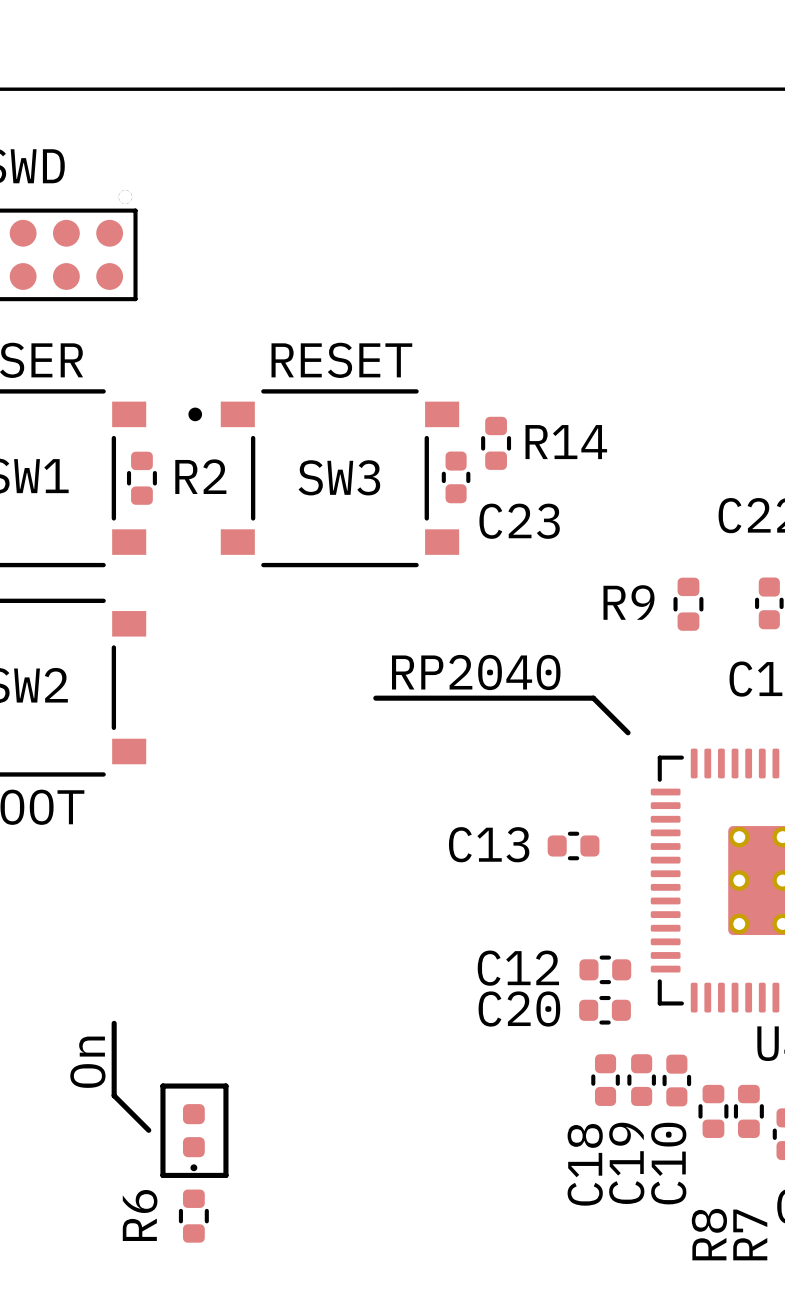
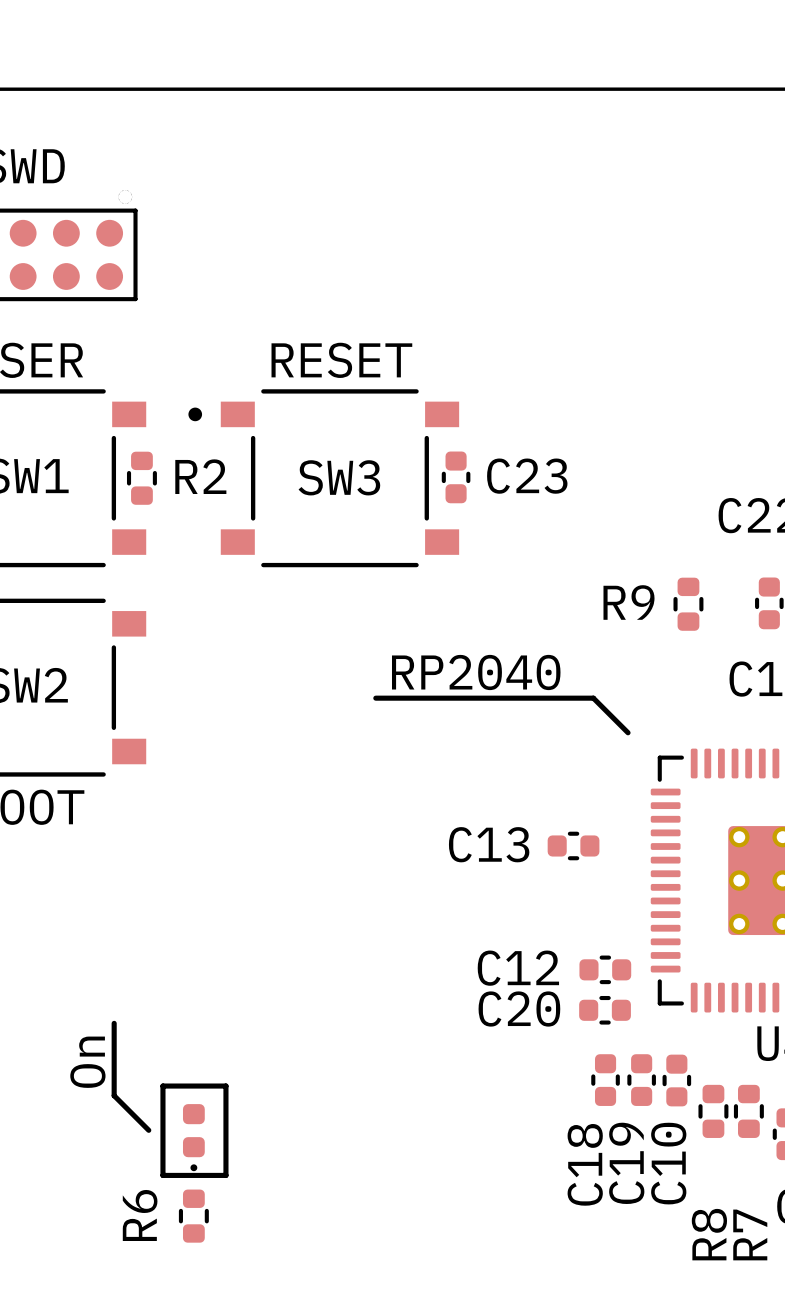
R14: (496, 443) -> none
C23 name position: C23 (519, 521) -> C23 (527, 476)

